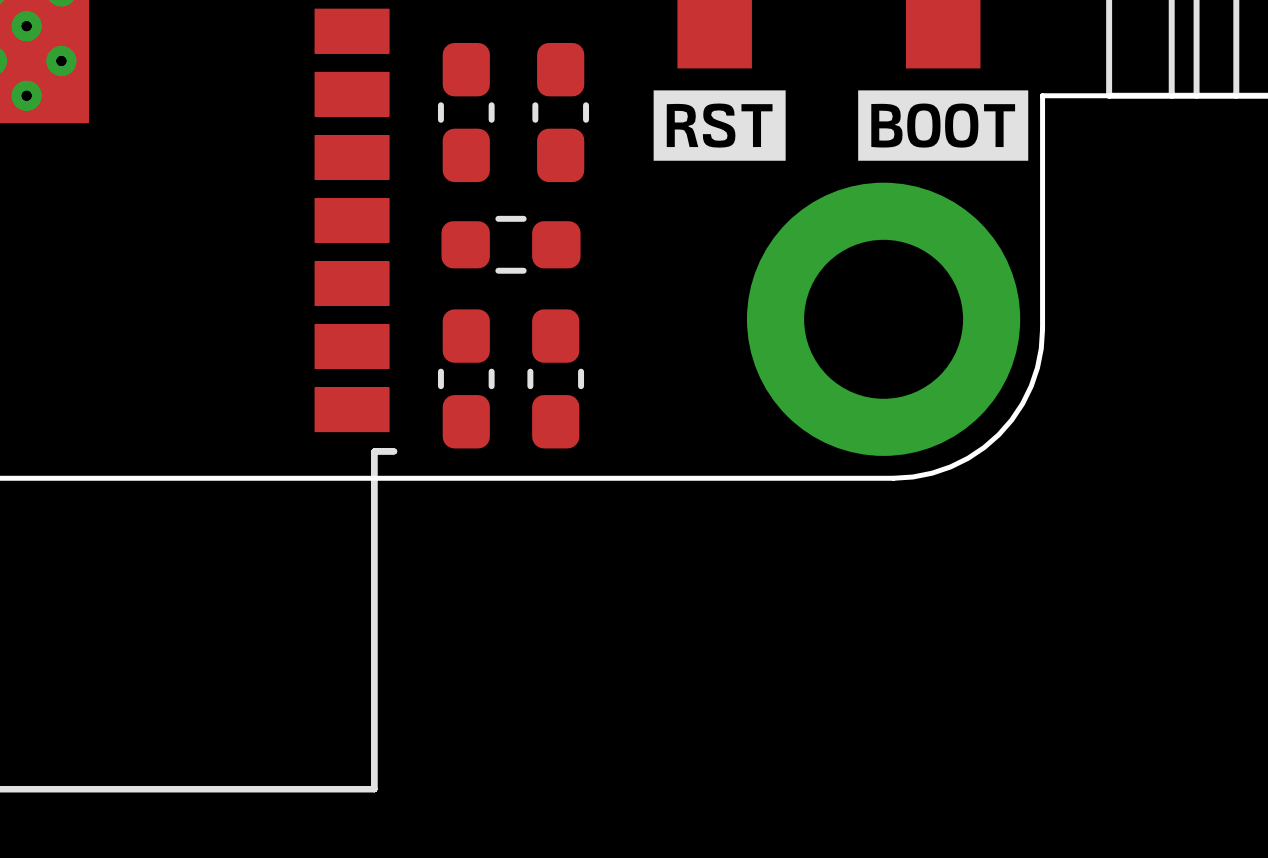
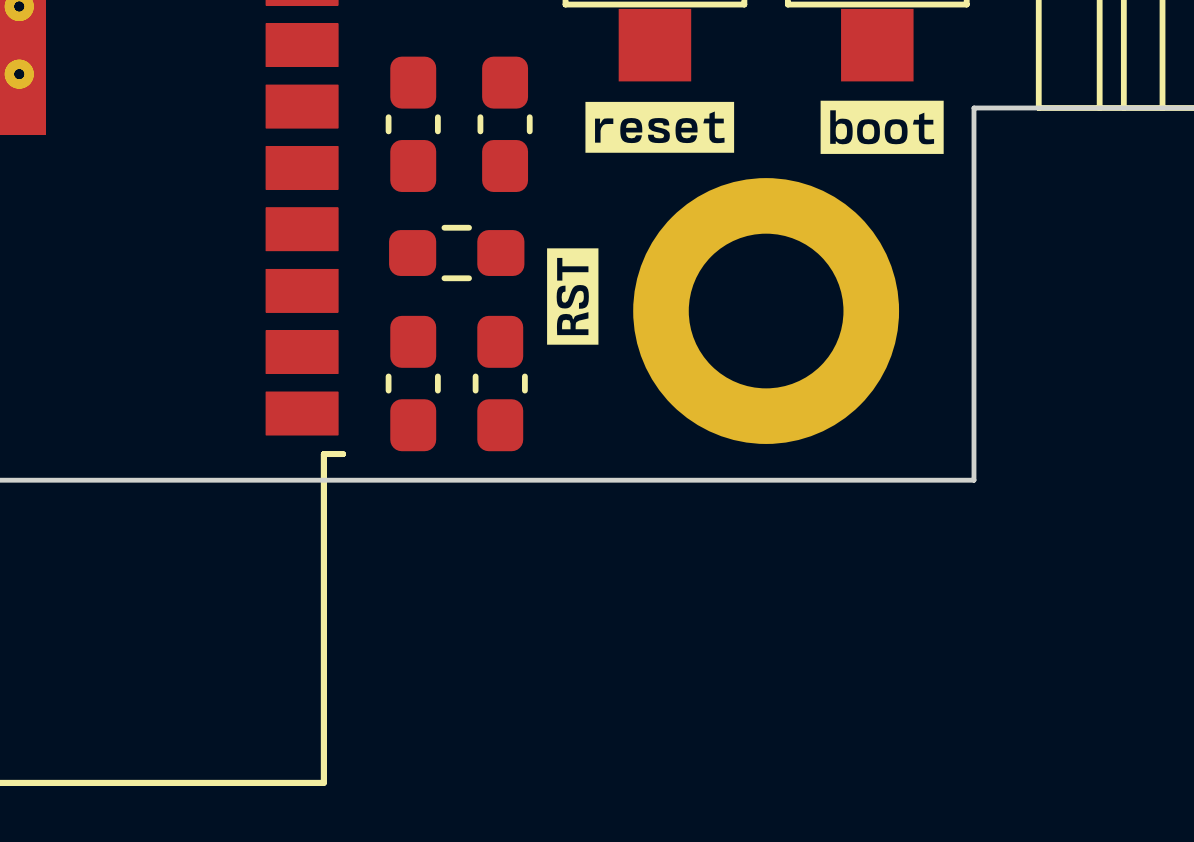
drawing shape: [653, 90, 786, 161] -> [585, 101, 735, 153]
drawing shape: [858, 90, 1029, 161] -> [820, 100, 944, 154]
drawing: none -> [547, 248, 599, 345]
part position: (883, 319) -> (766, 311)
board edge: (1042, 329) (1037, 367) (1031, 386) (1011, 419) (998, 434) (968, 458) (950, 466) (912, 477) (893, 478) -> (973, 335) (973, 480) (828, 480)

